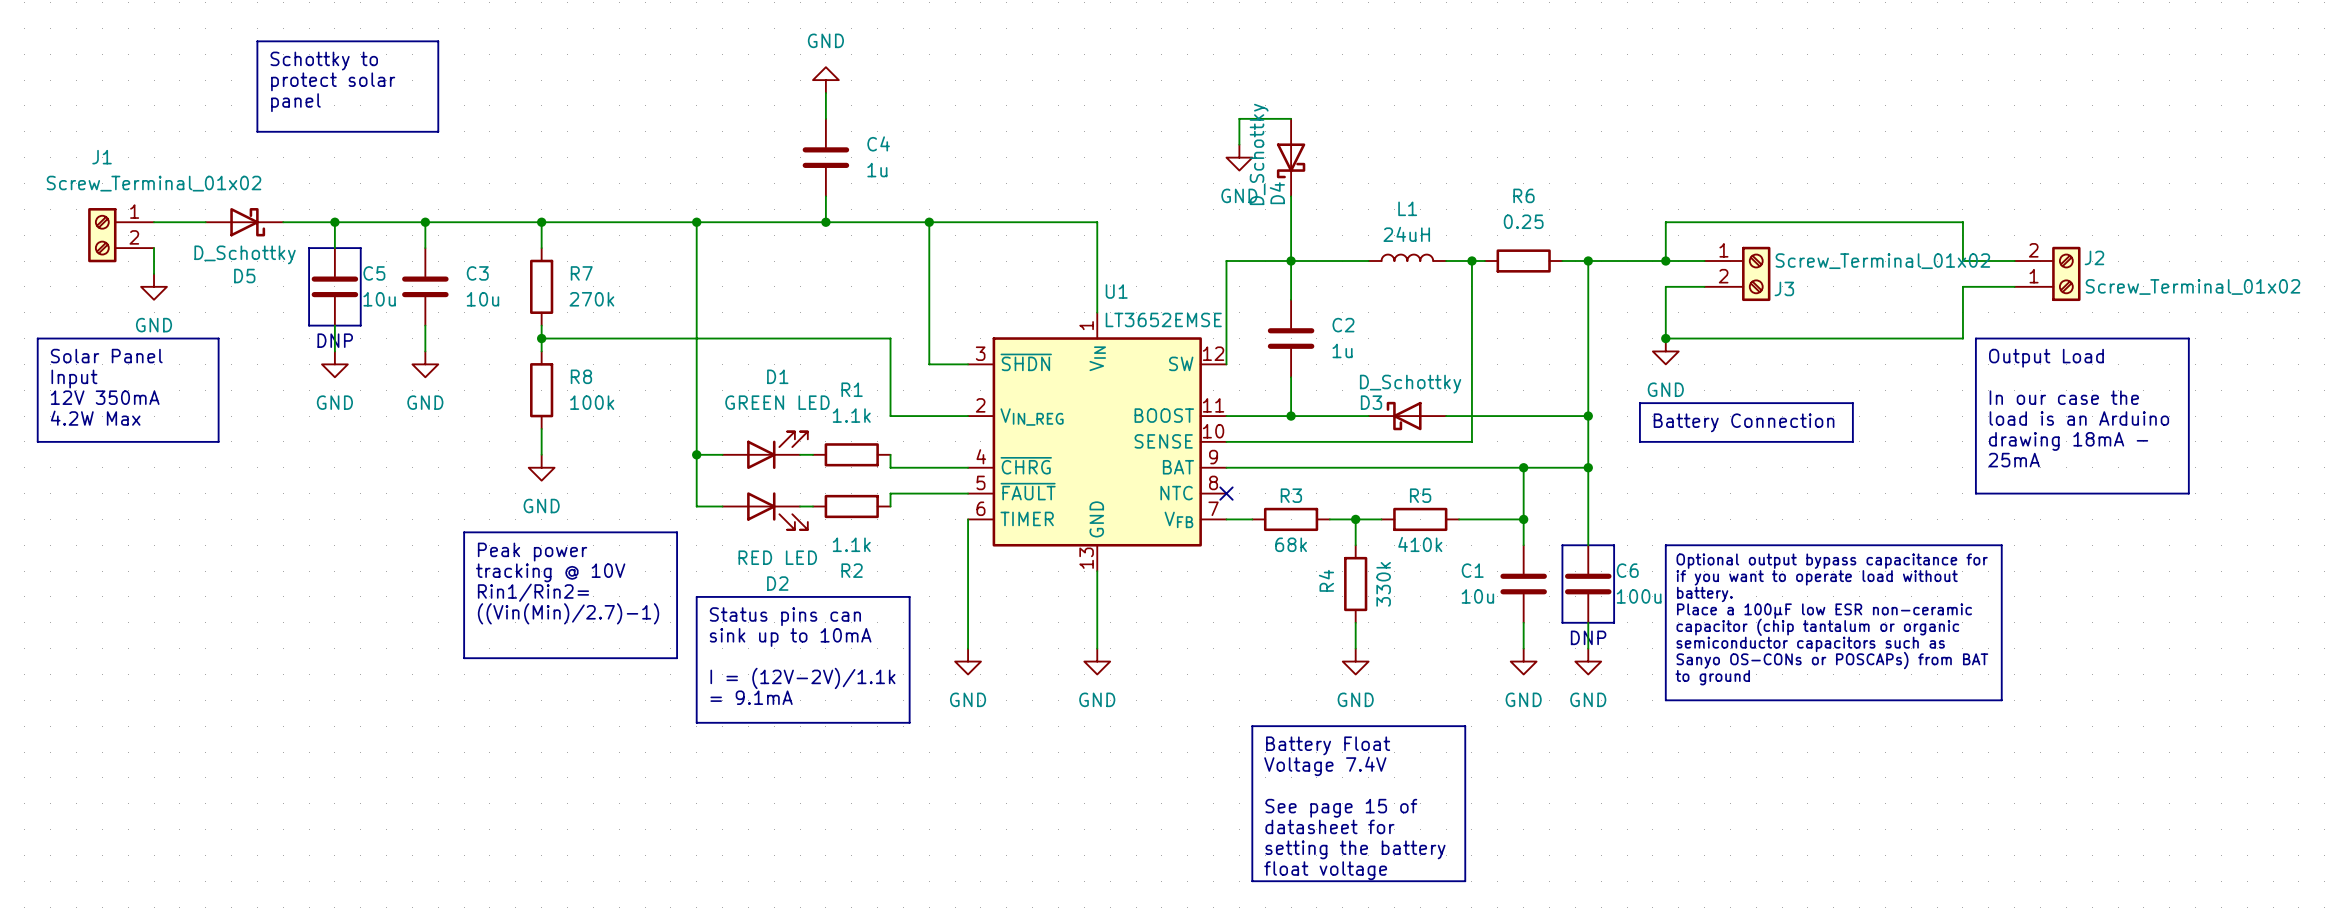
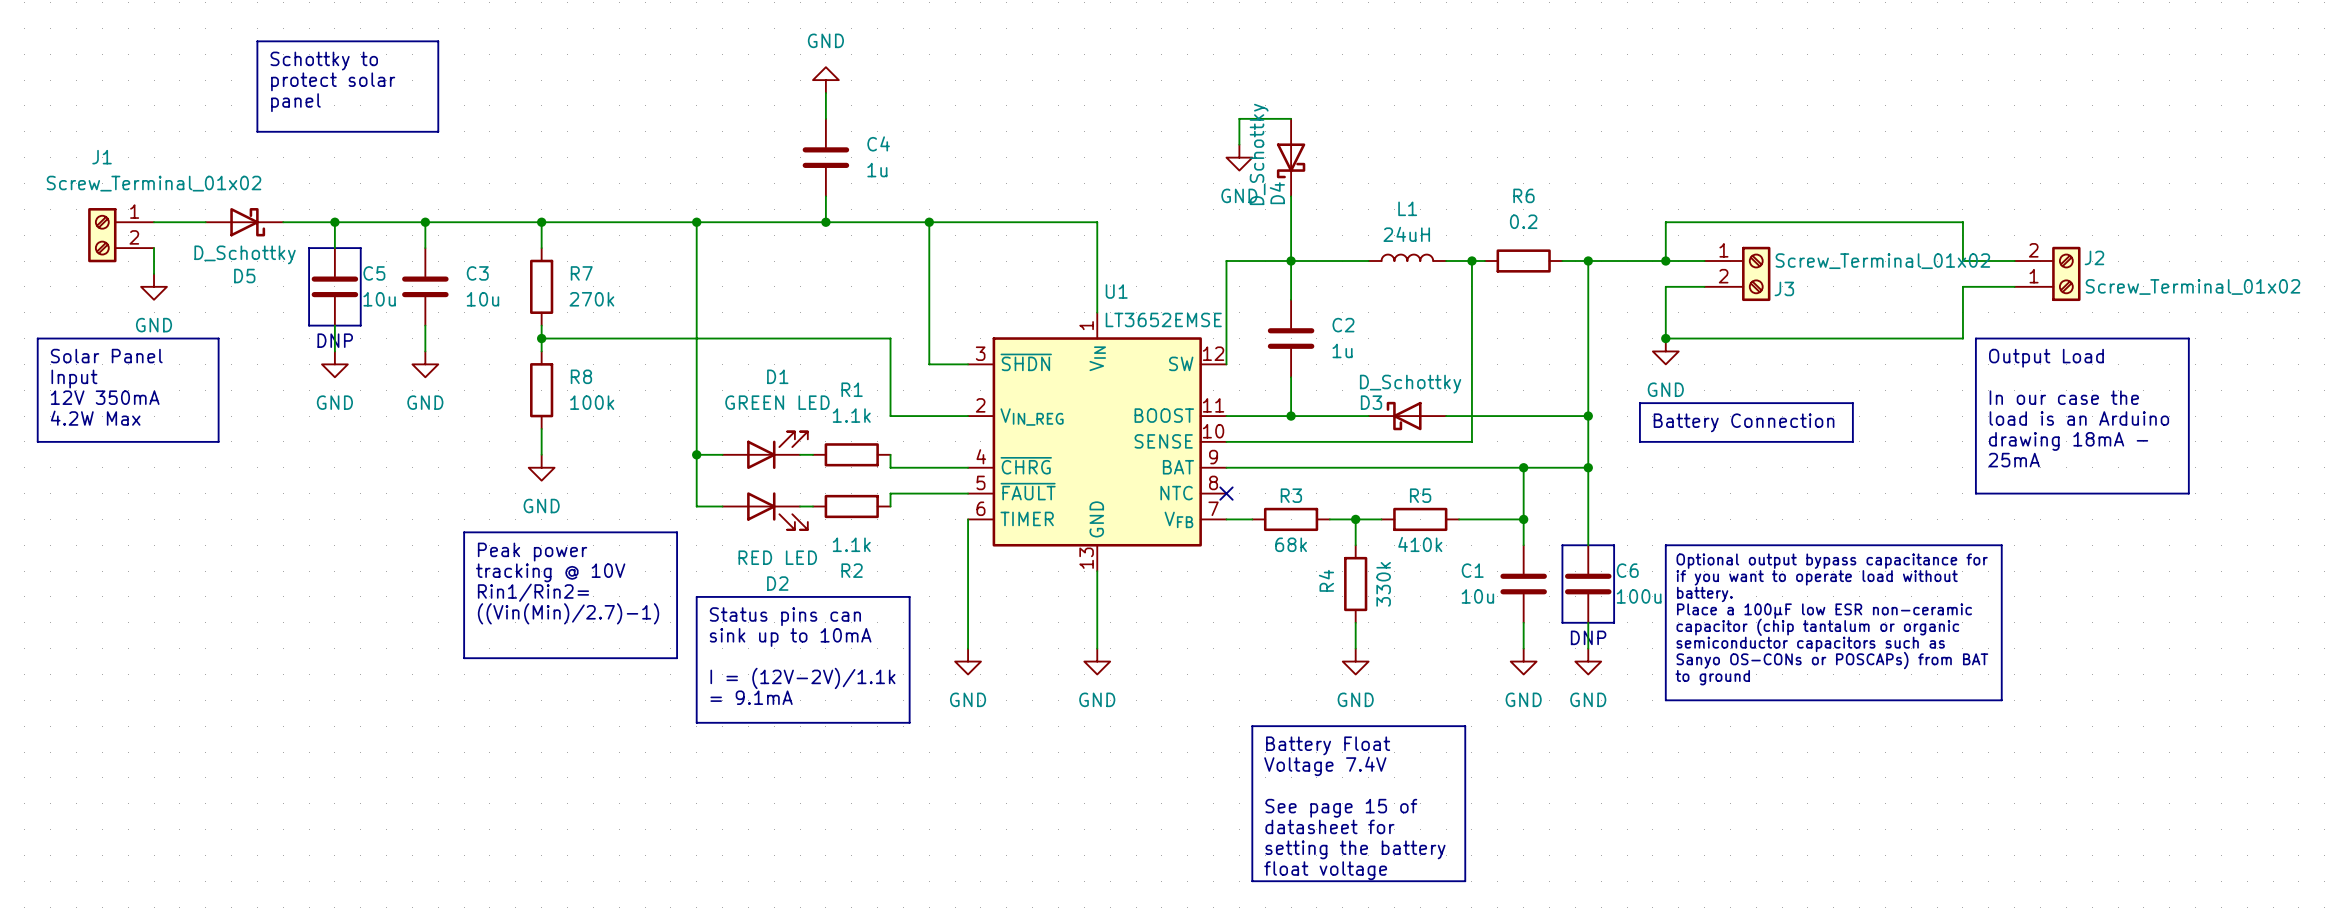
R6 value: 0.25 (1523, 221) -> 0.2 (1523, 221)

